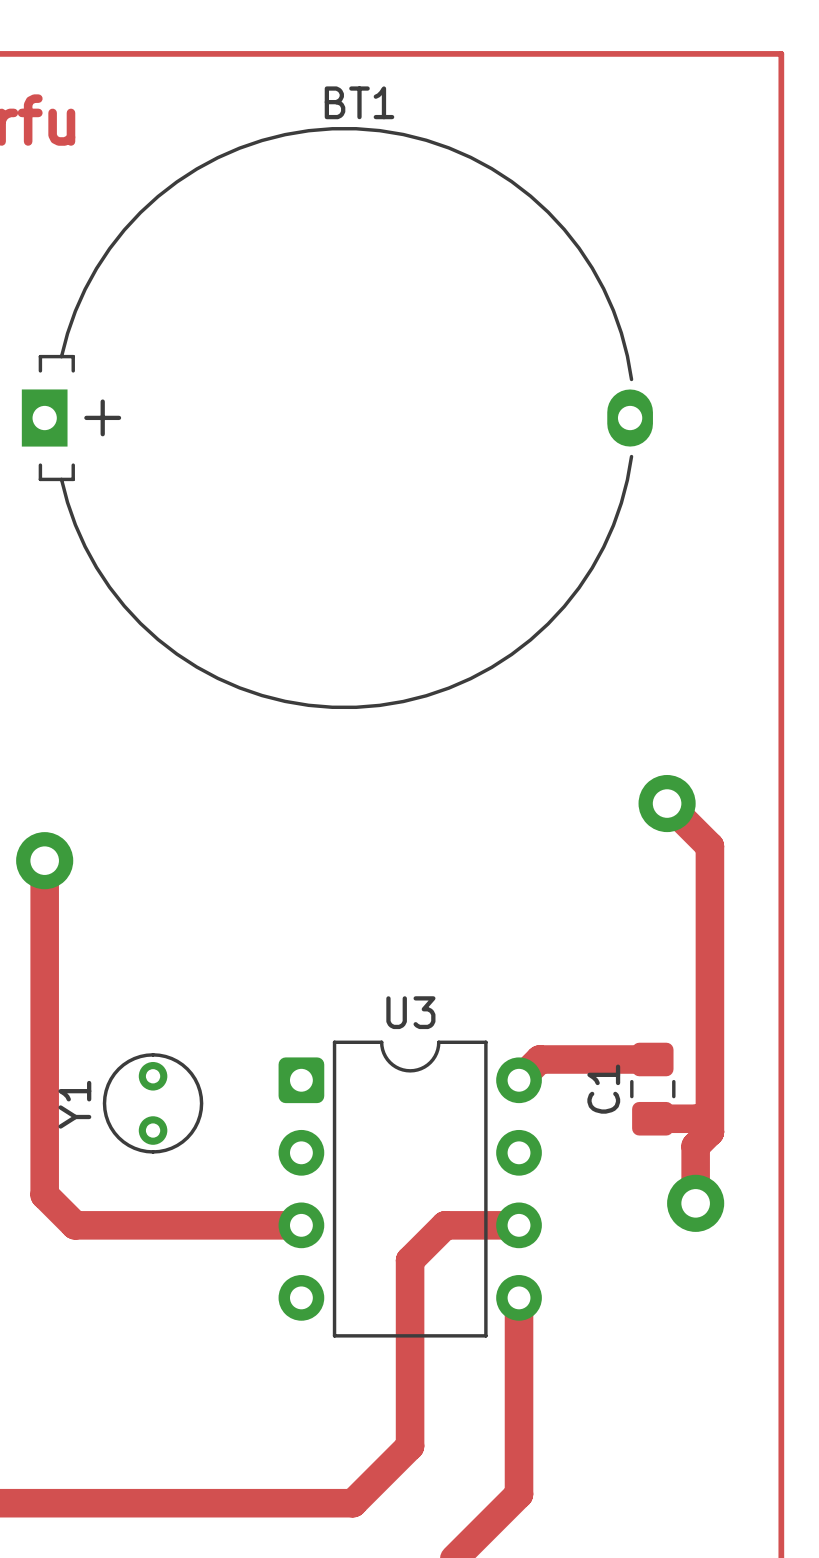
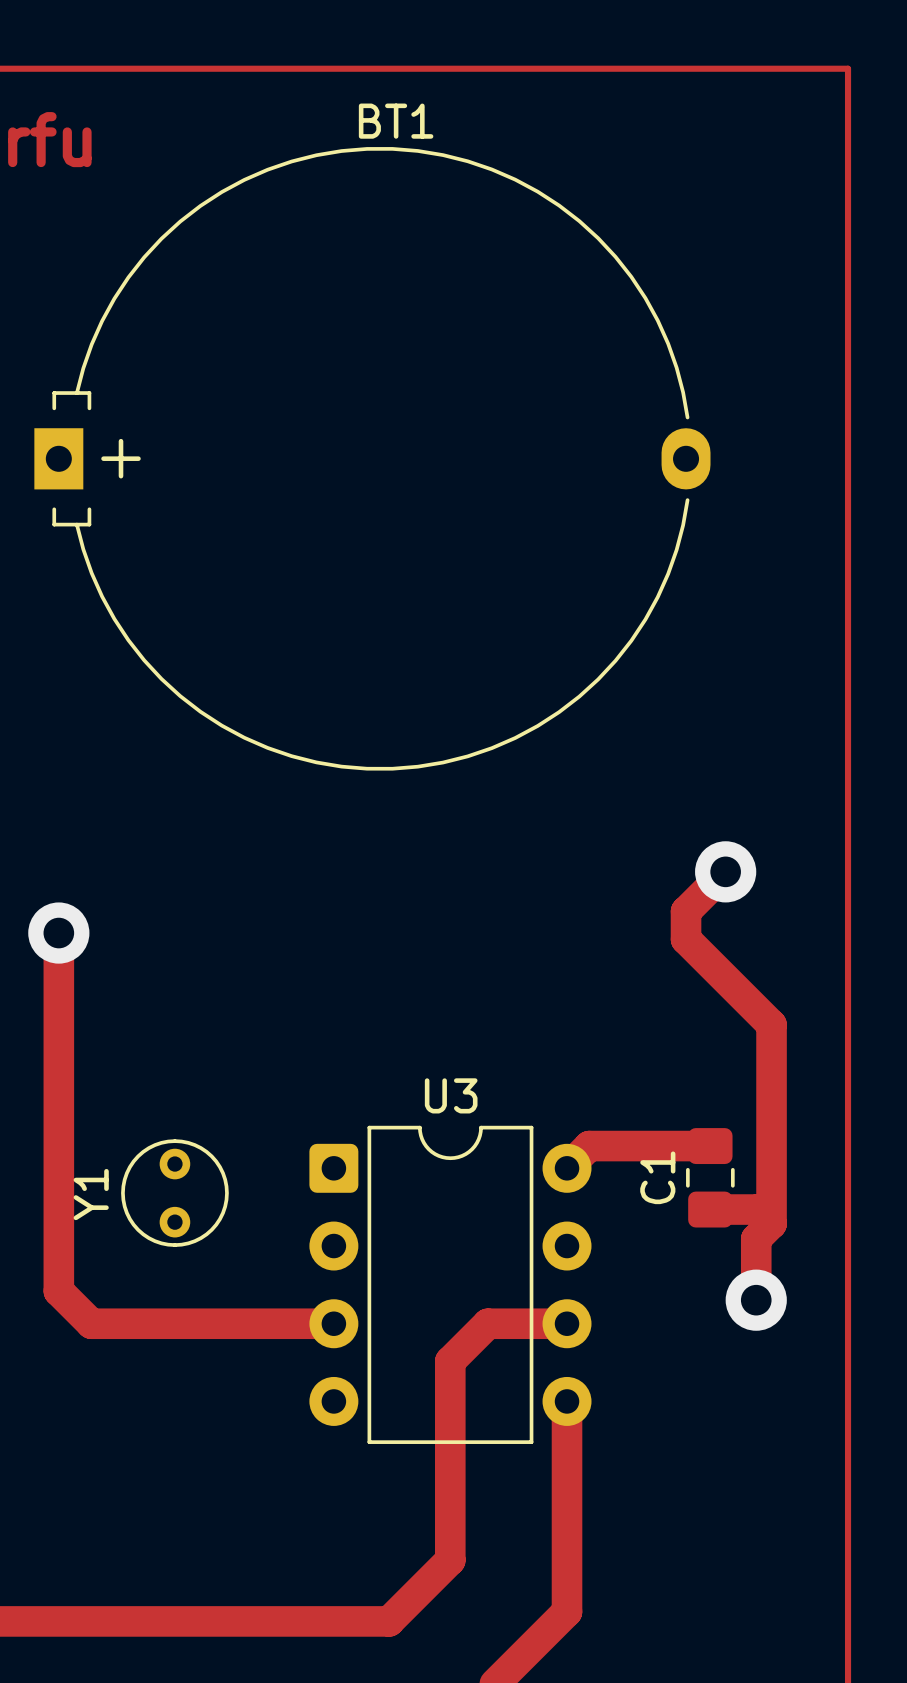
track: (667, 803) (709, 846) (709, 946) -> (725, 871) (686, 911) (686, 939) (771, 1024)

